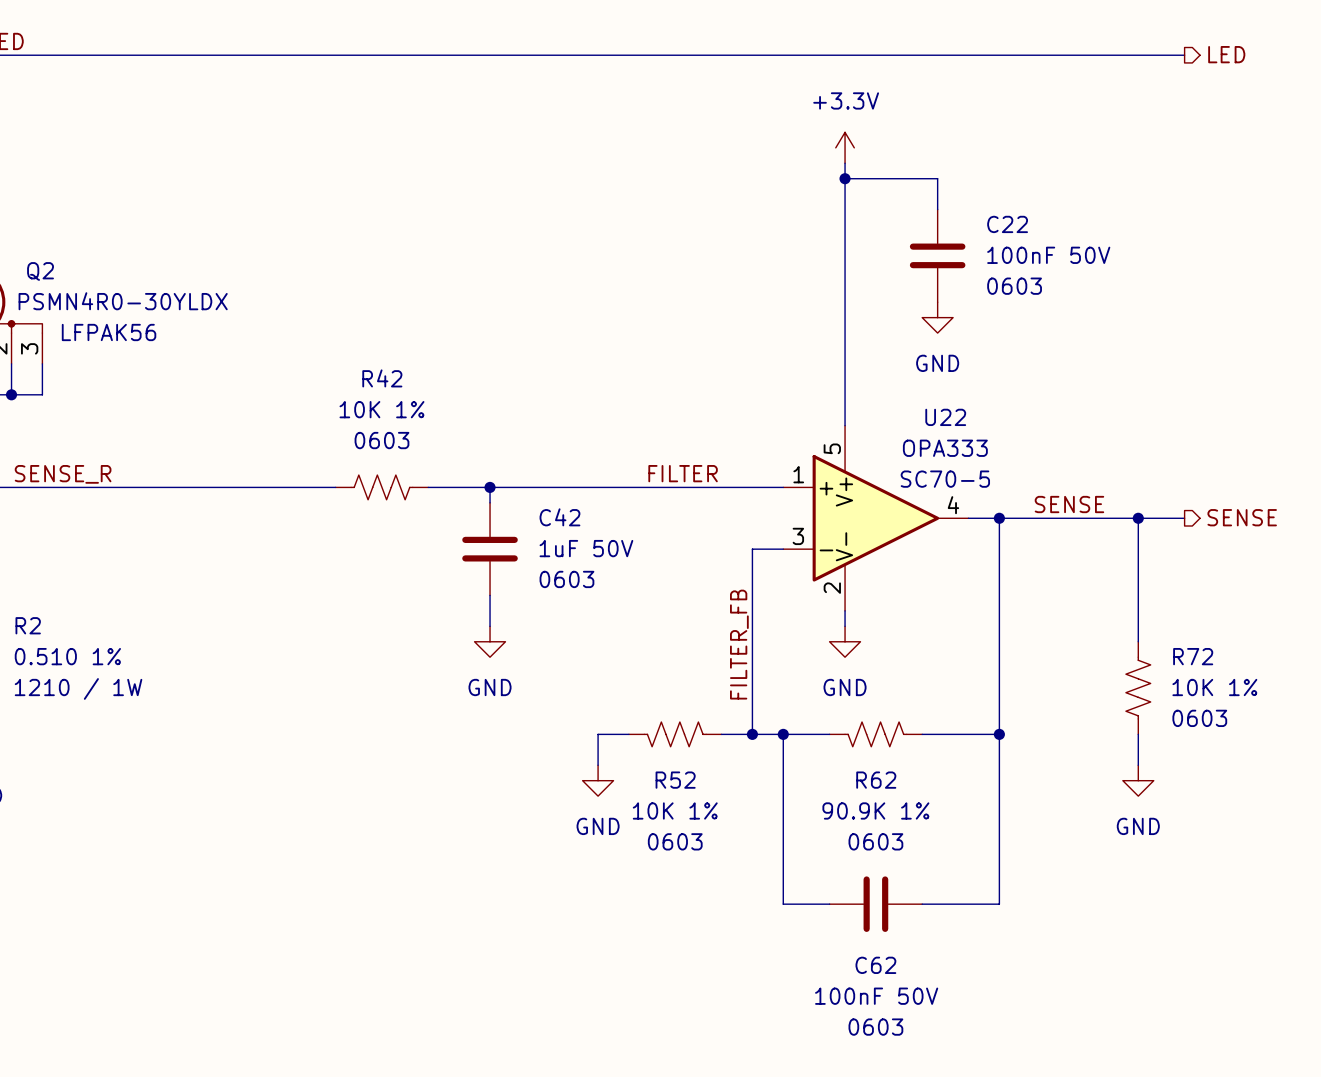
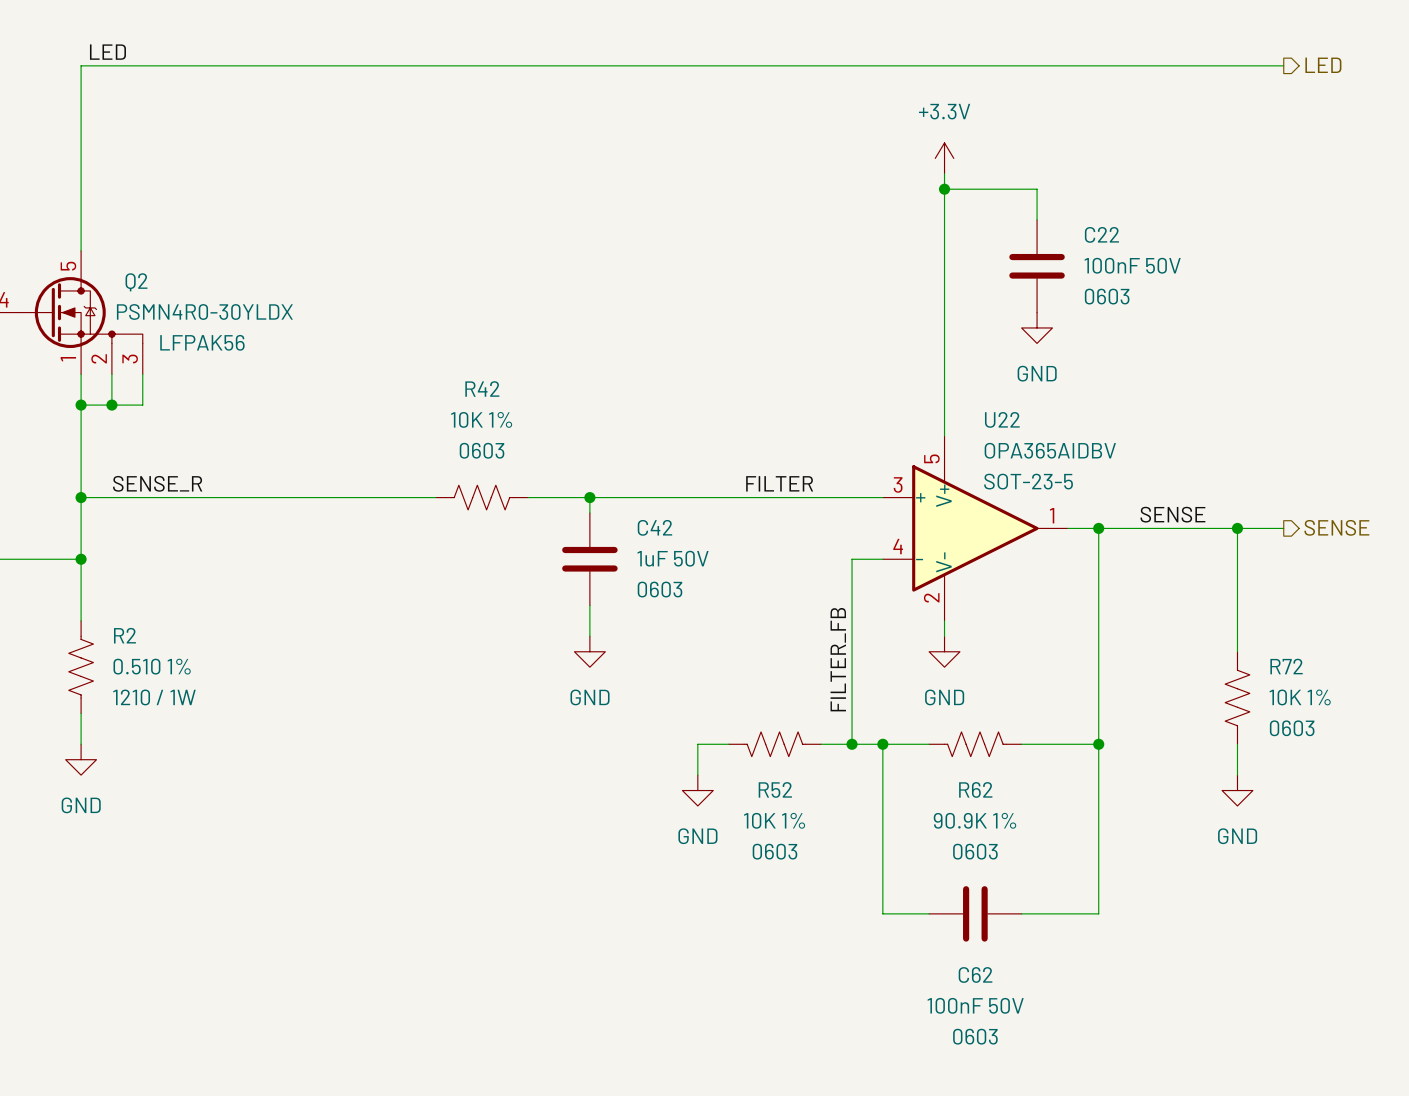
U22 name position: U22 (945, 417) -> U22 (1002, 419)
U22 value: OPA333 (945, 448) -> OPA365AIDBV (1050, 450)
U22 pin number: 1 (798, 474) -> 3 (898, 484)
U22 text: SC70-5 (945, 479) -> SOT-23-5 (1028, 481)
U22 pin number: 4 (953, 505) -> 1 (1052, 515)
U22 pin number: 3 (798, 536) -> 4 (898, 546)

